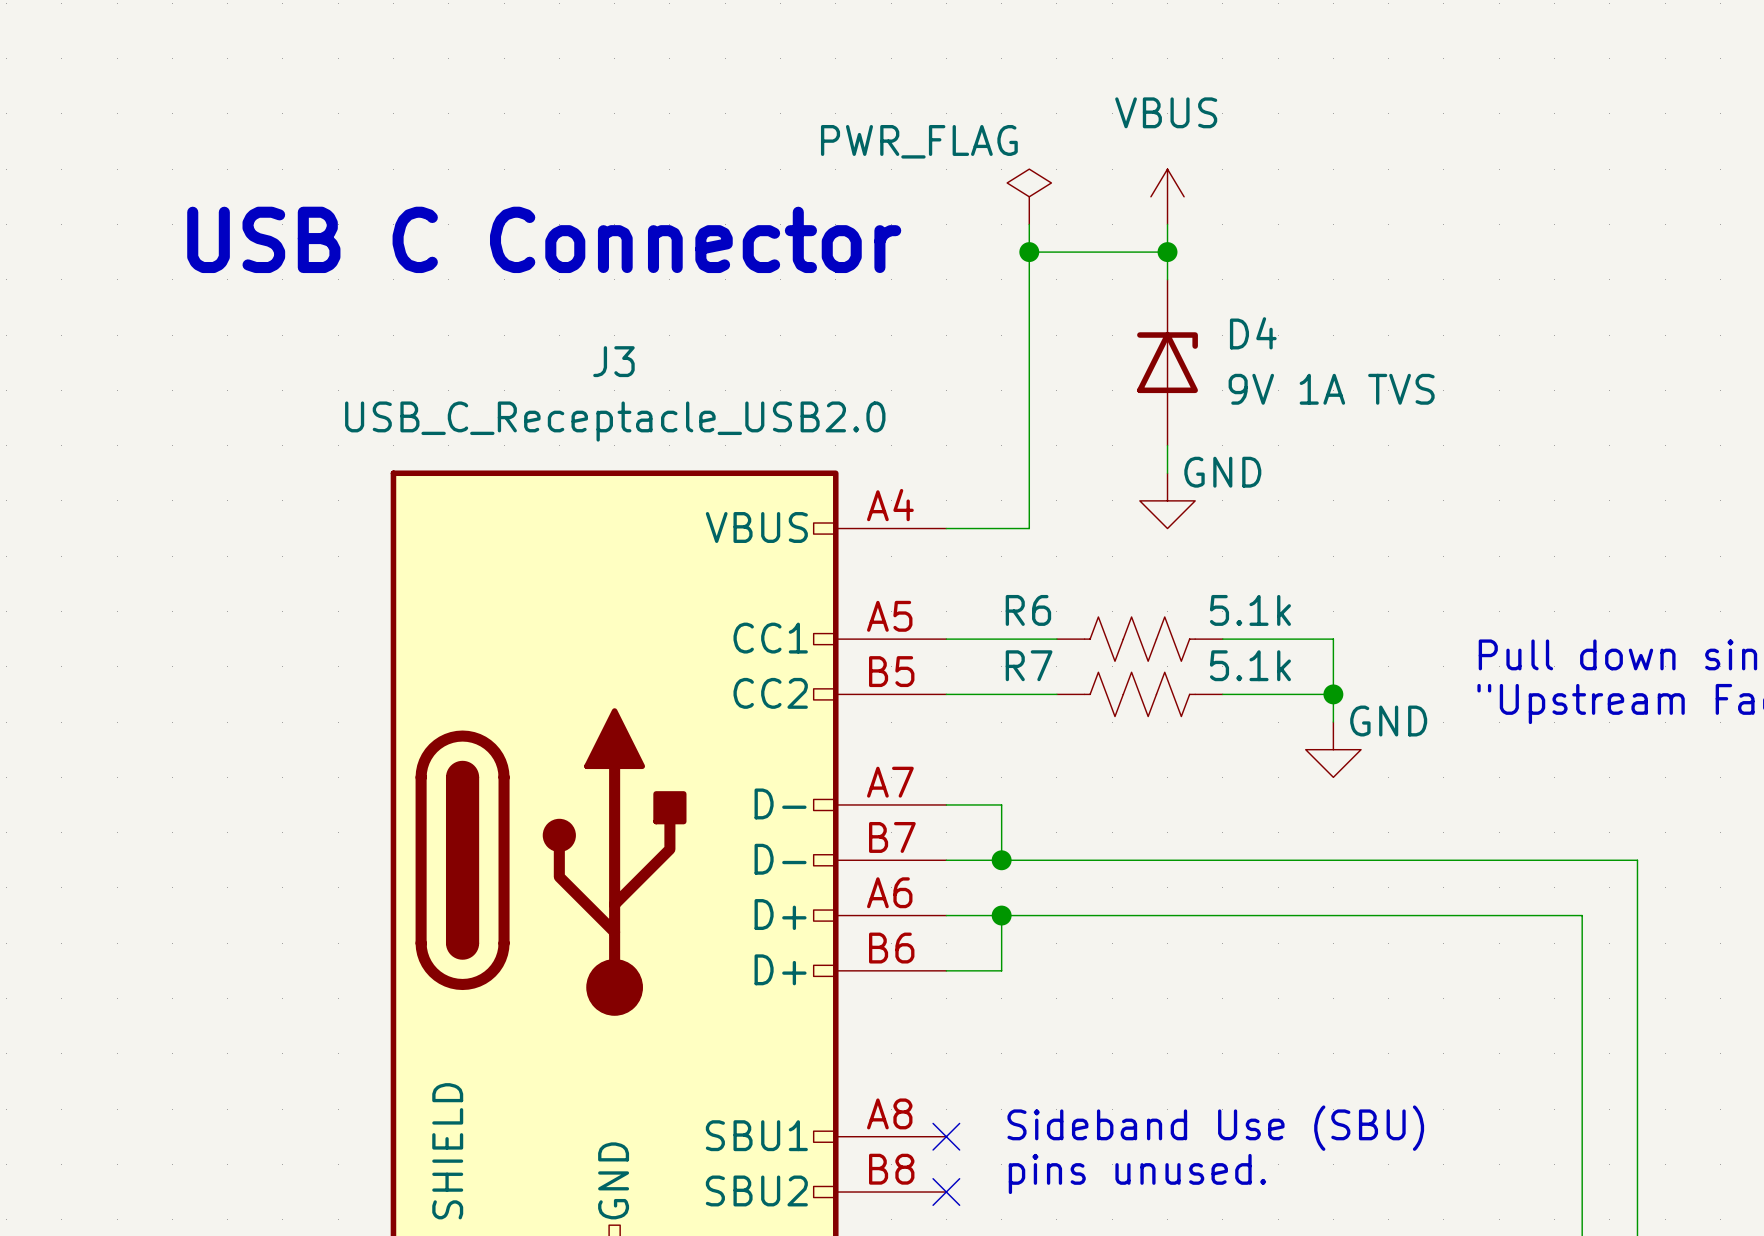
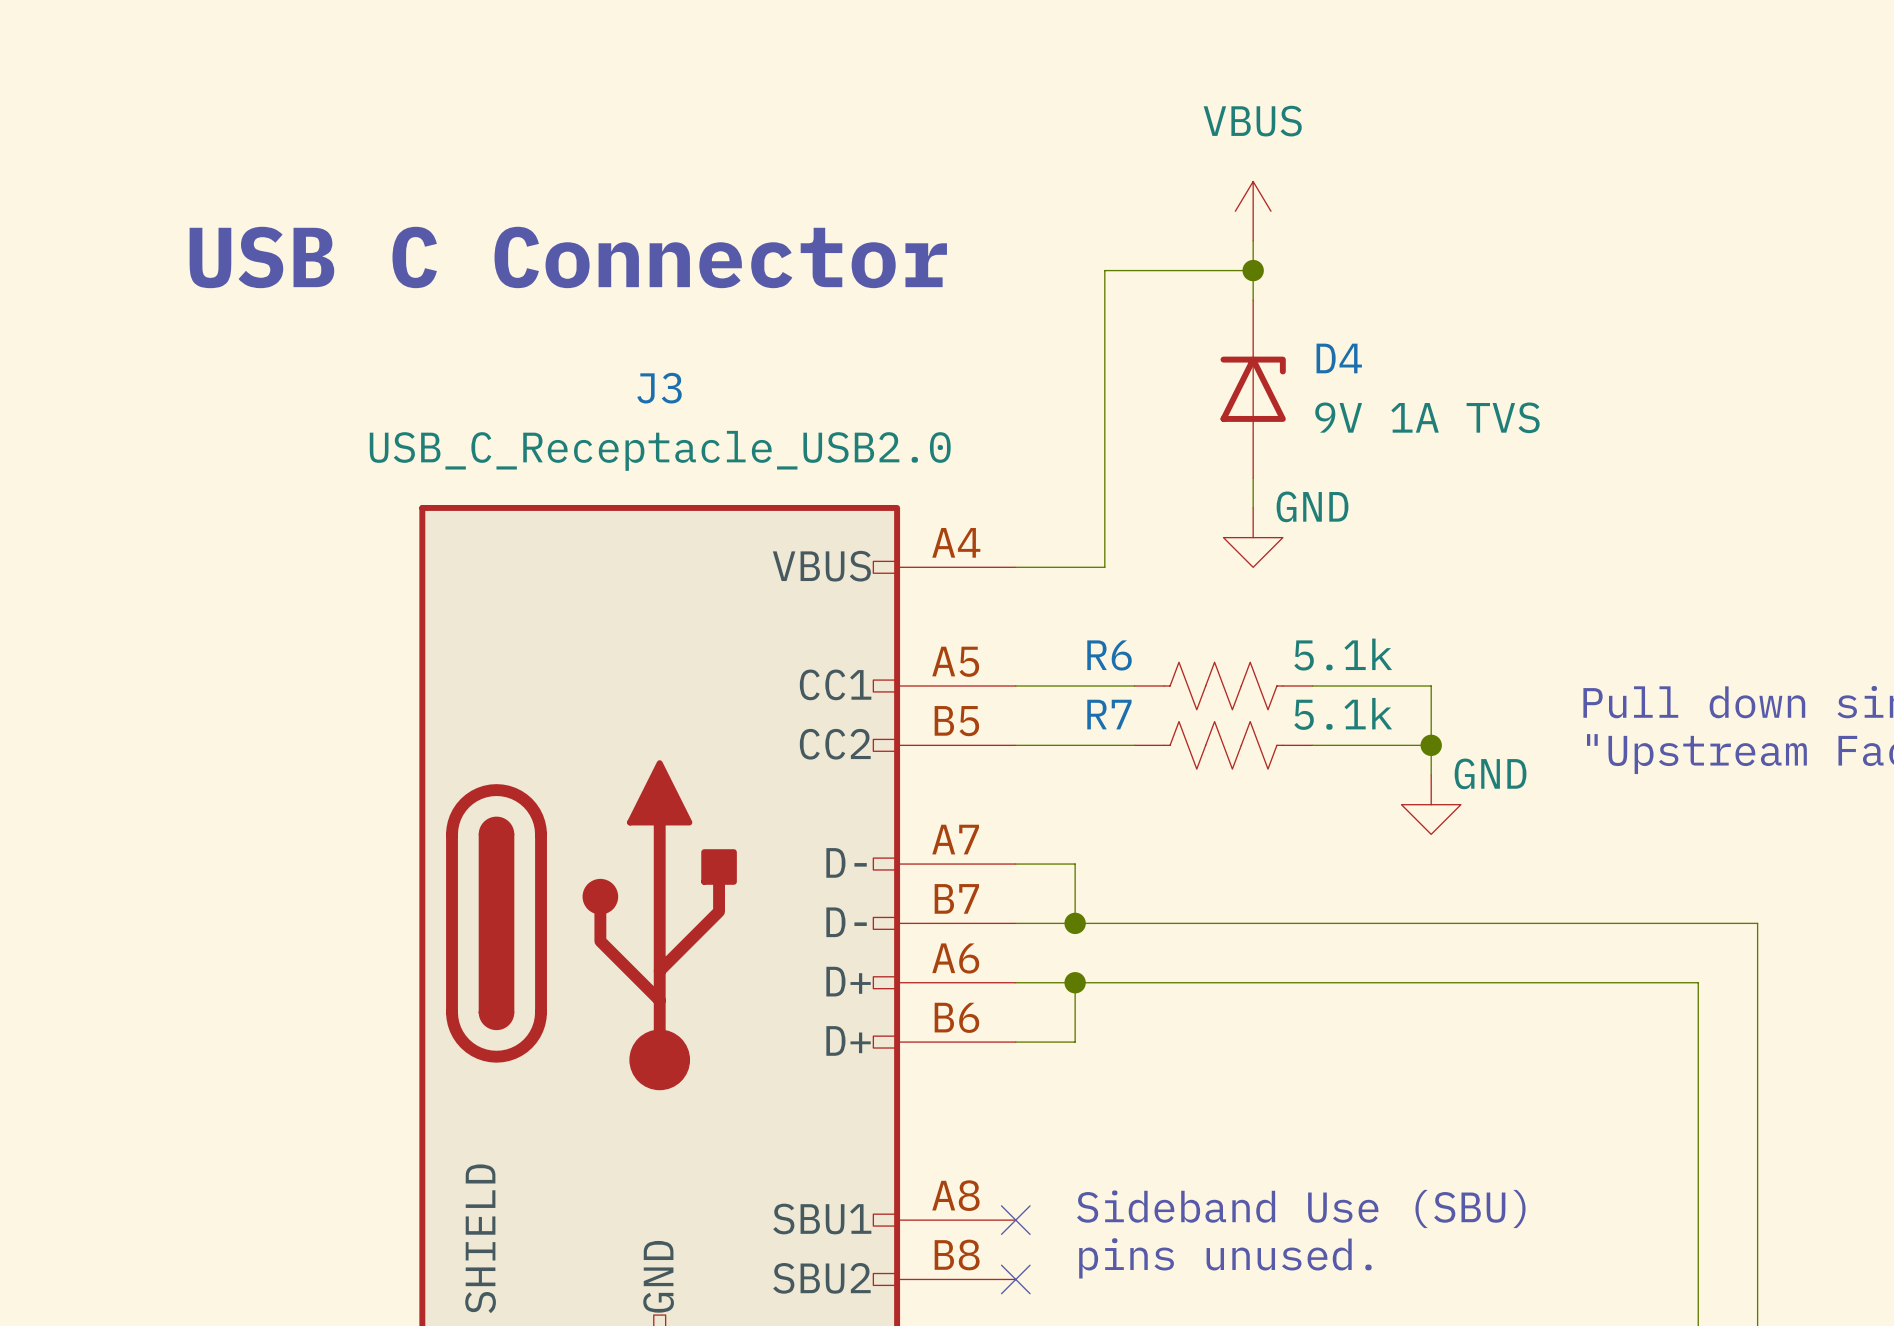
power symbol: PWR_FLAG (1029, 196) -> none
wire: (1029, 224) (1029, 252) -> none
junction: (1029, 252) -> none

